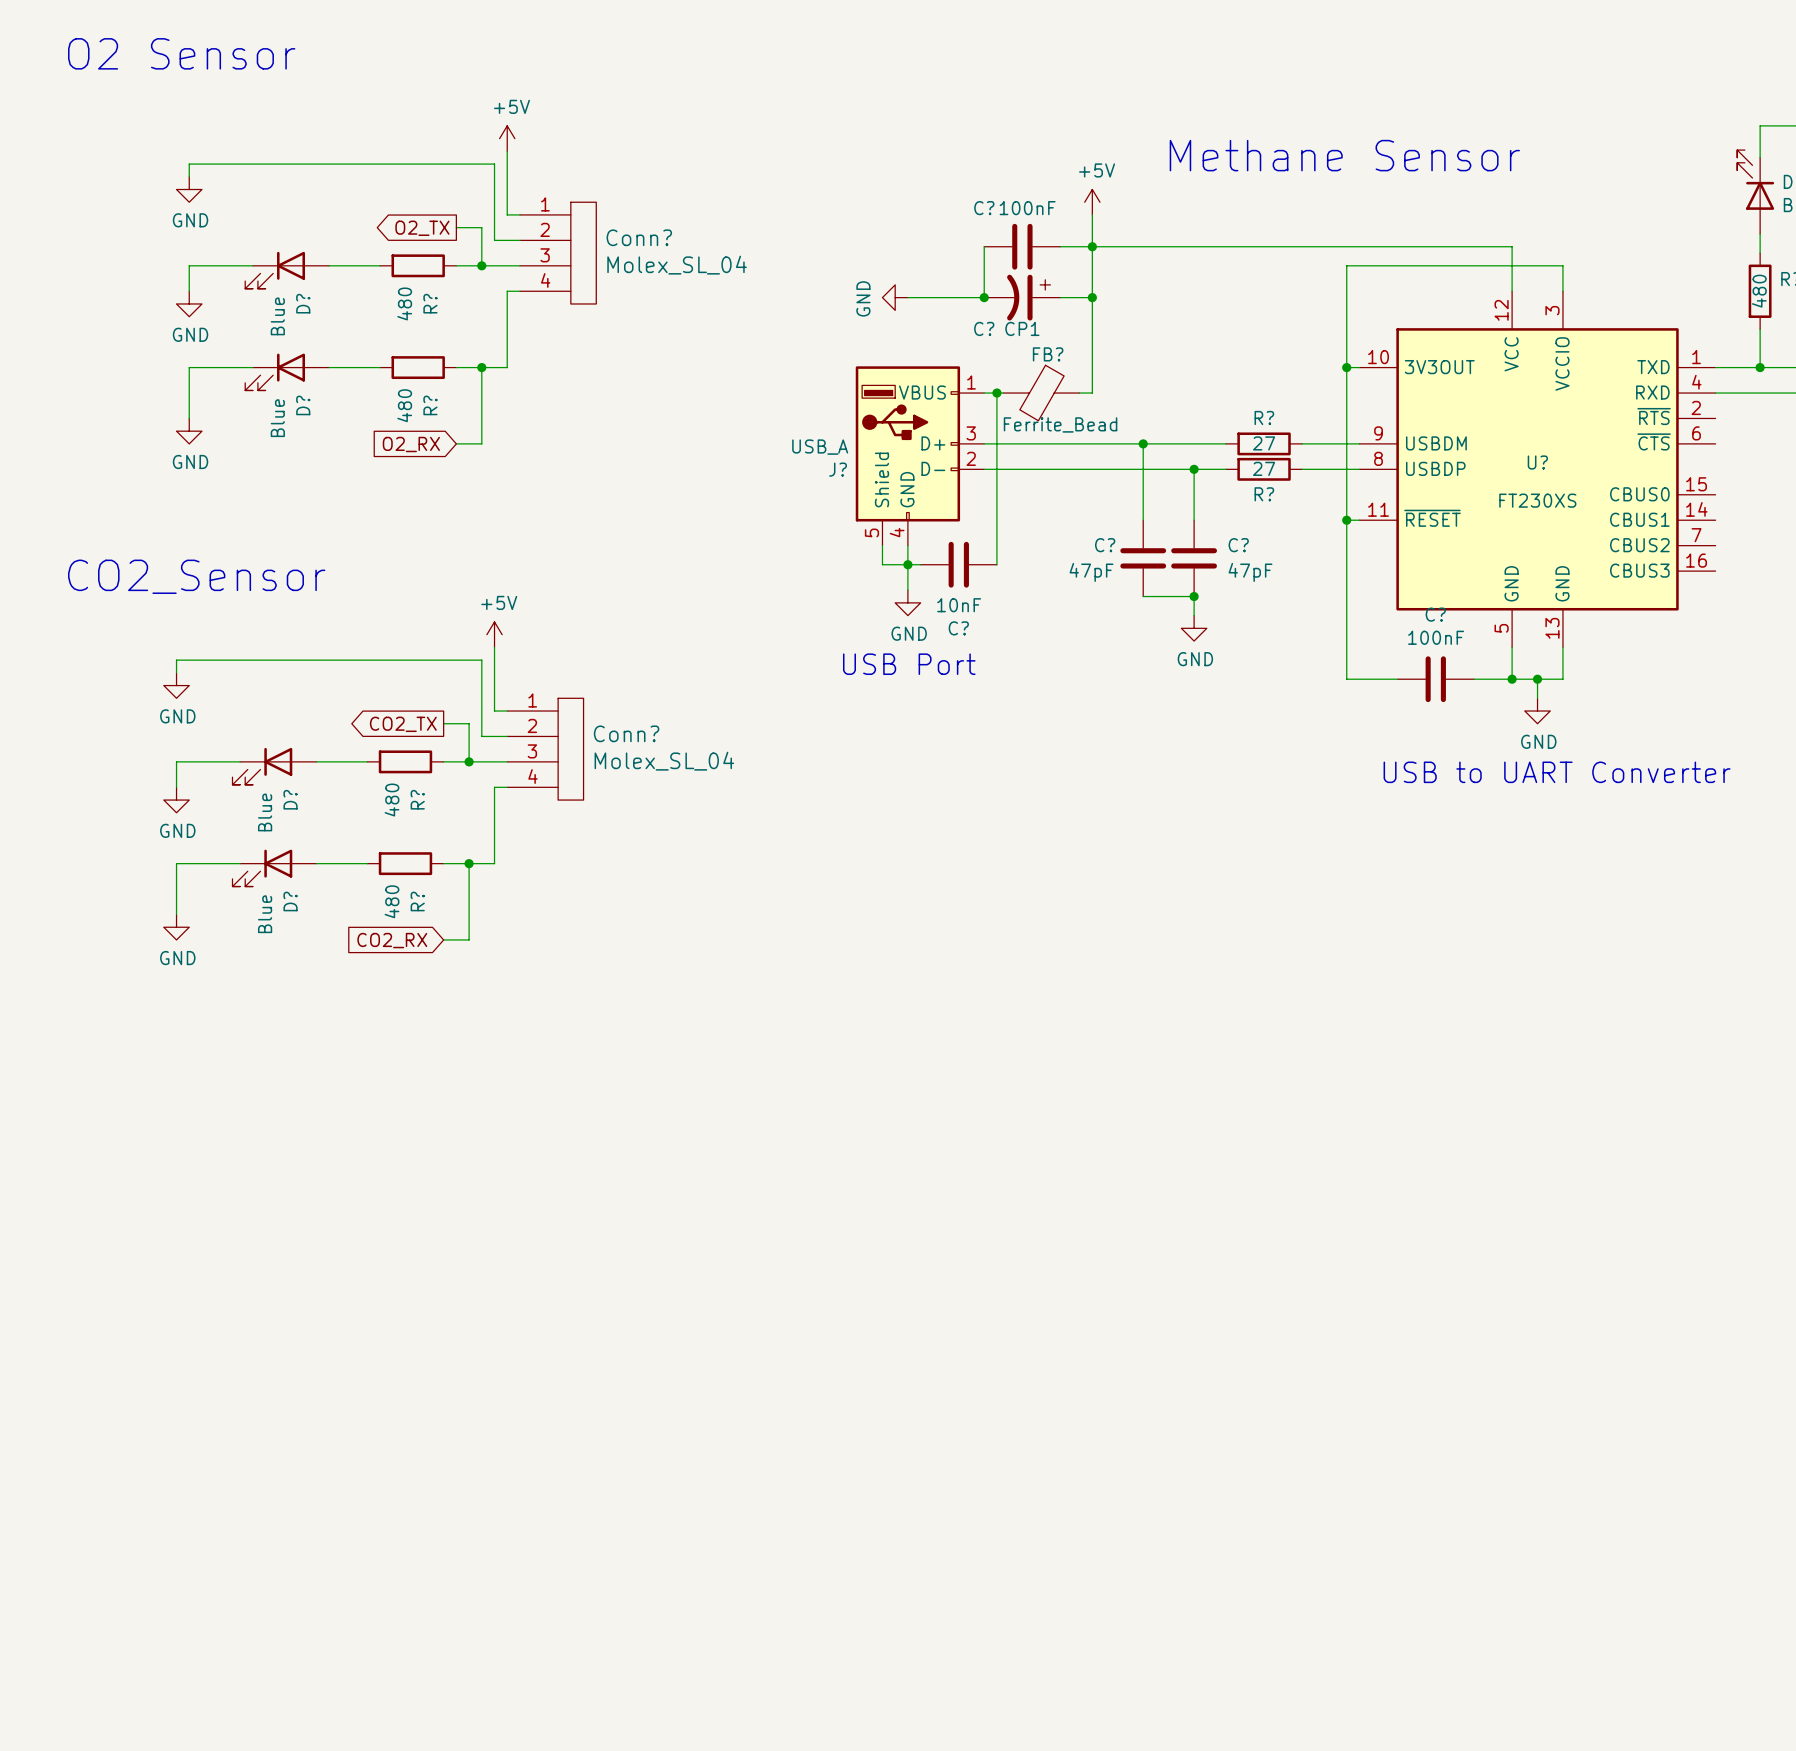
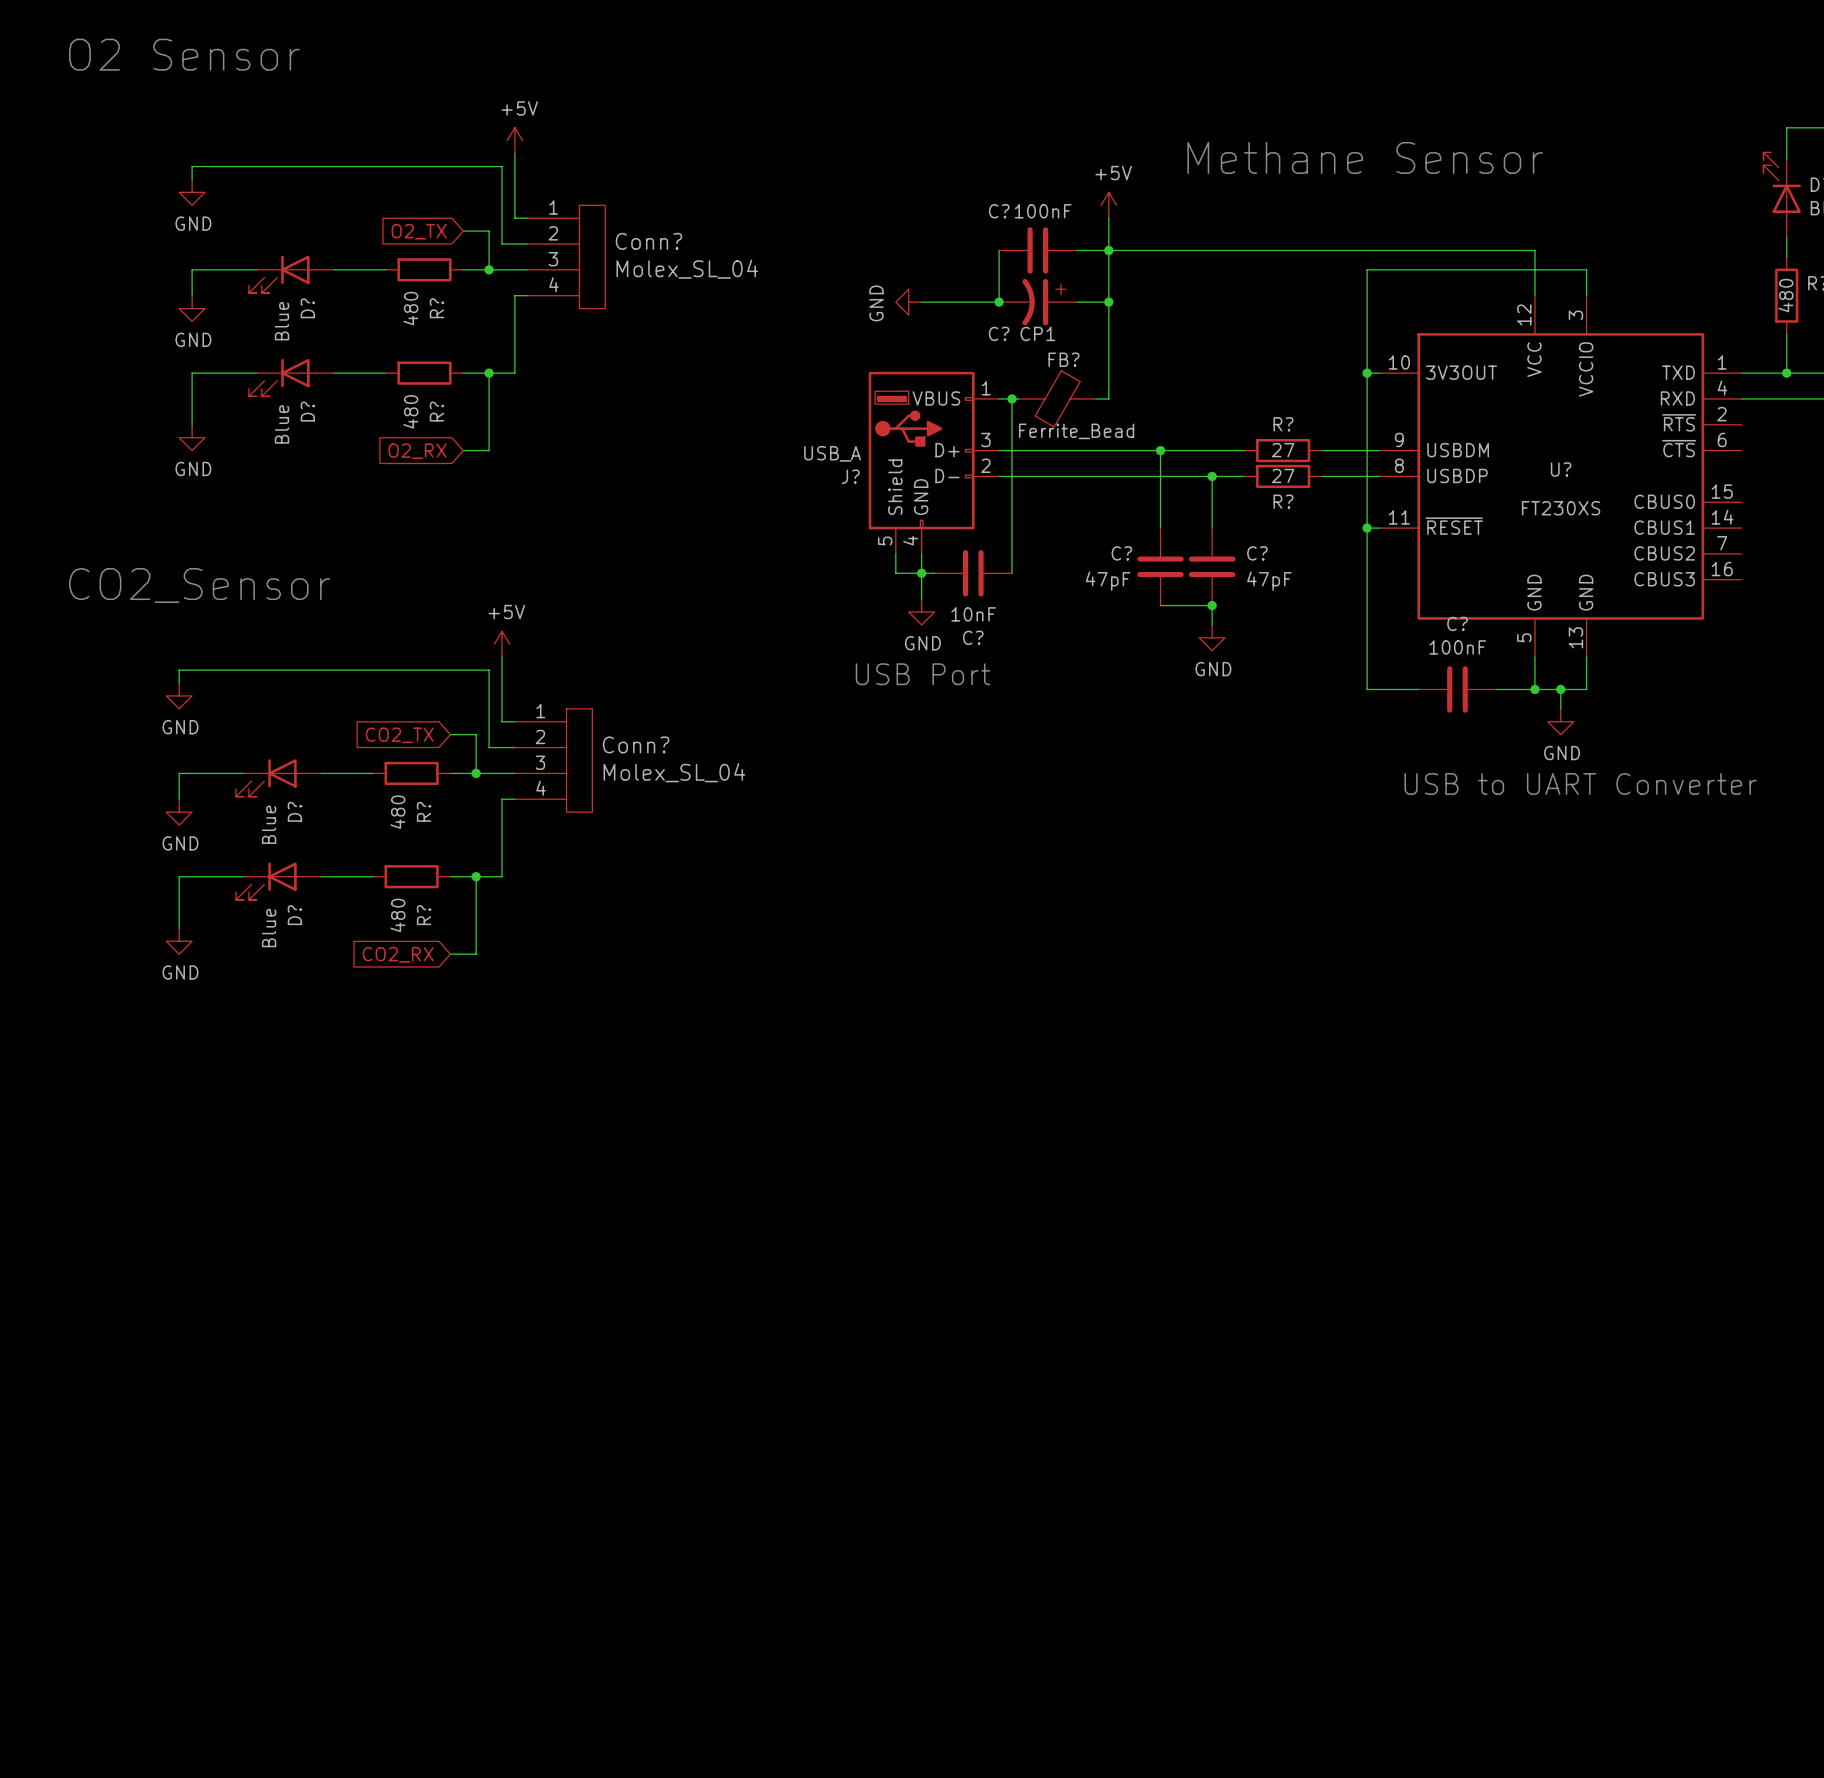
global label shape: output (422, 228) -> input (419, 231)
global label shape: output (403, 724) -> input (399, 735)

